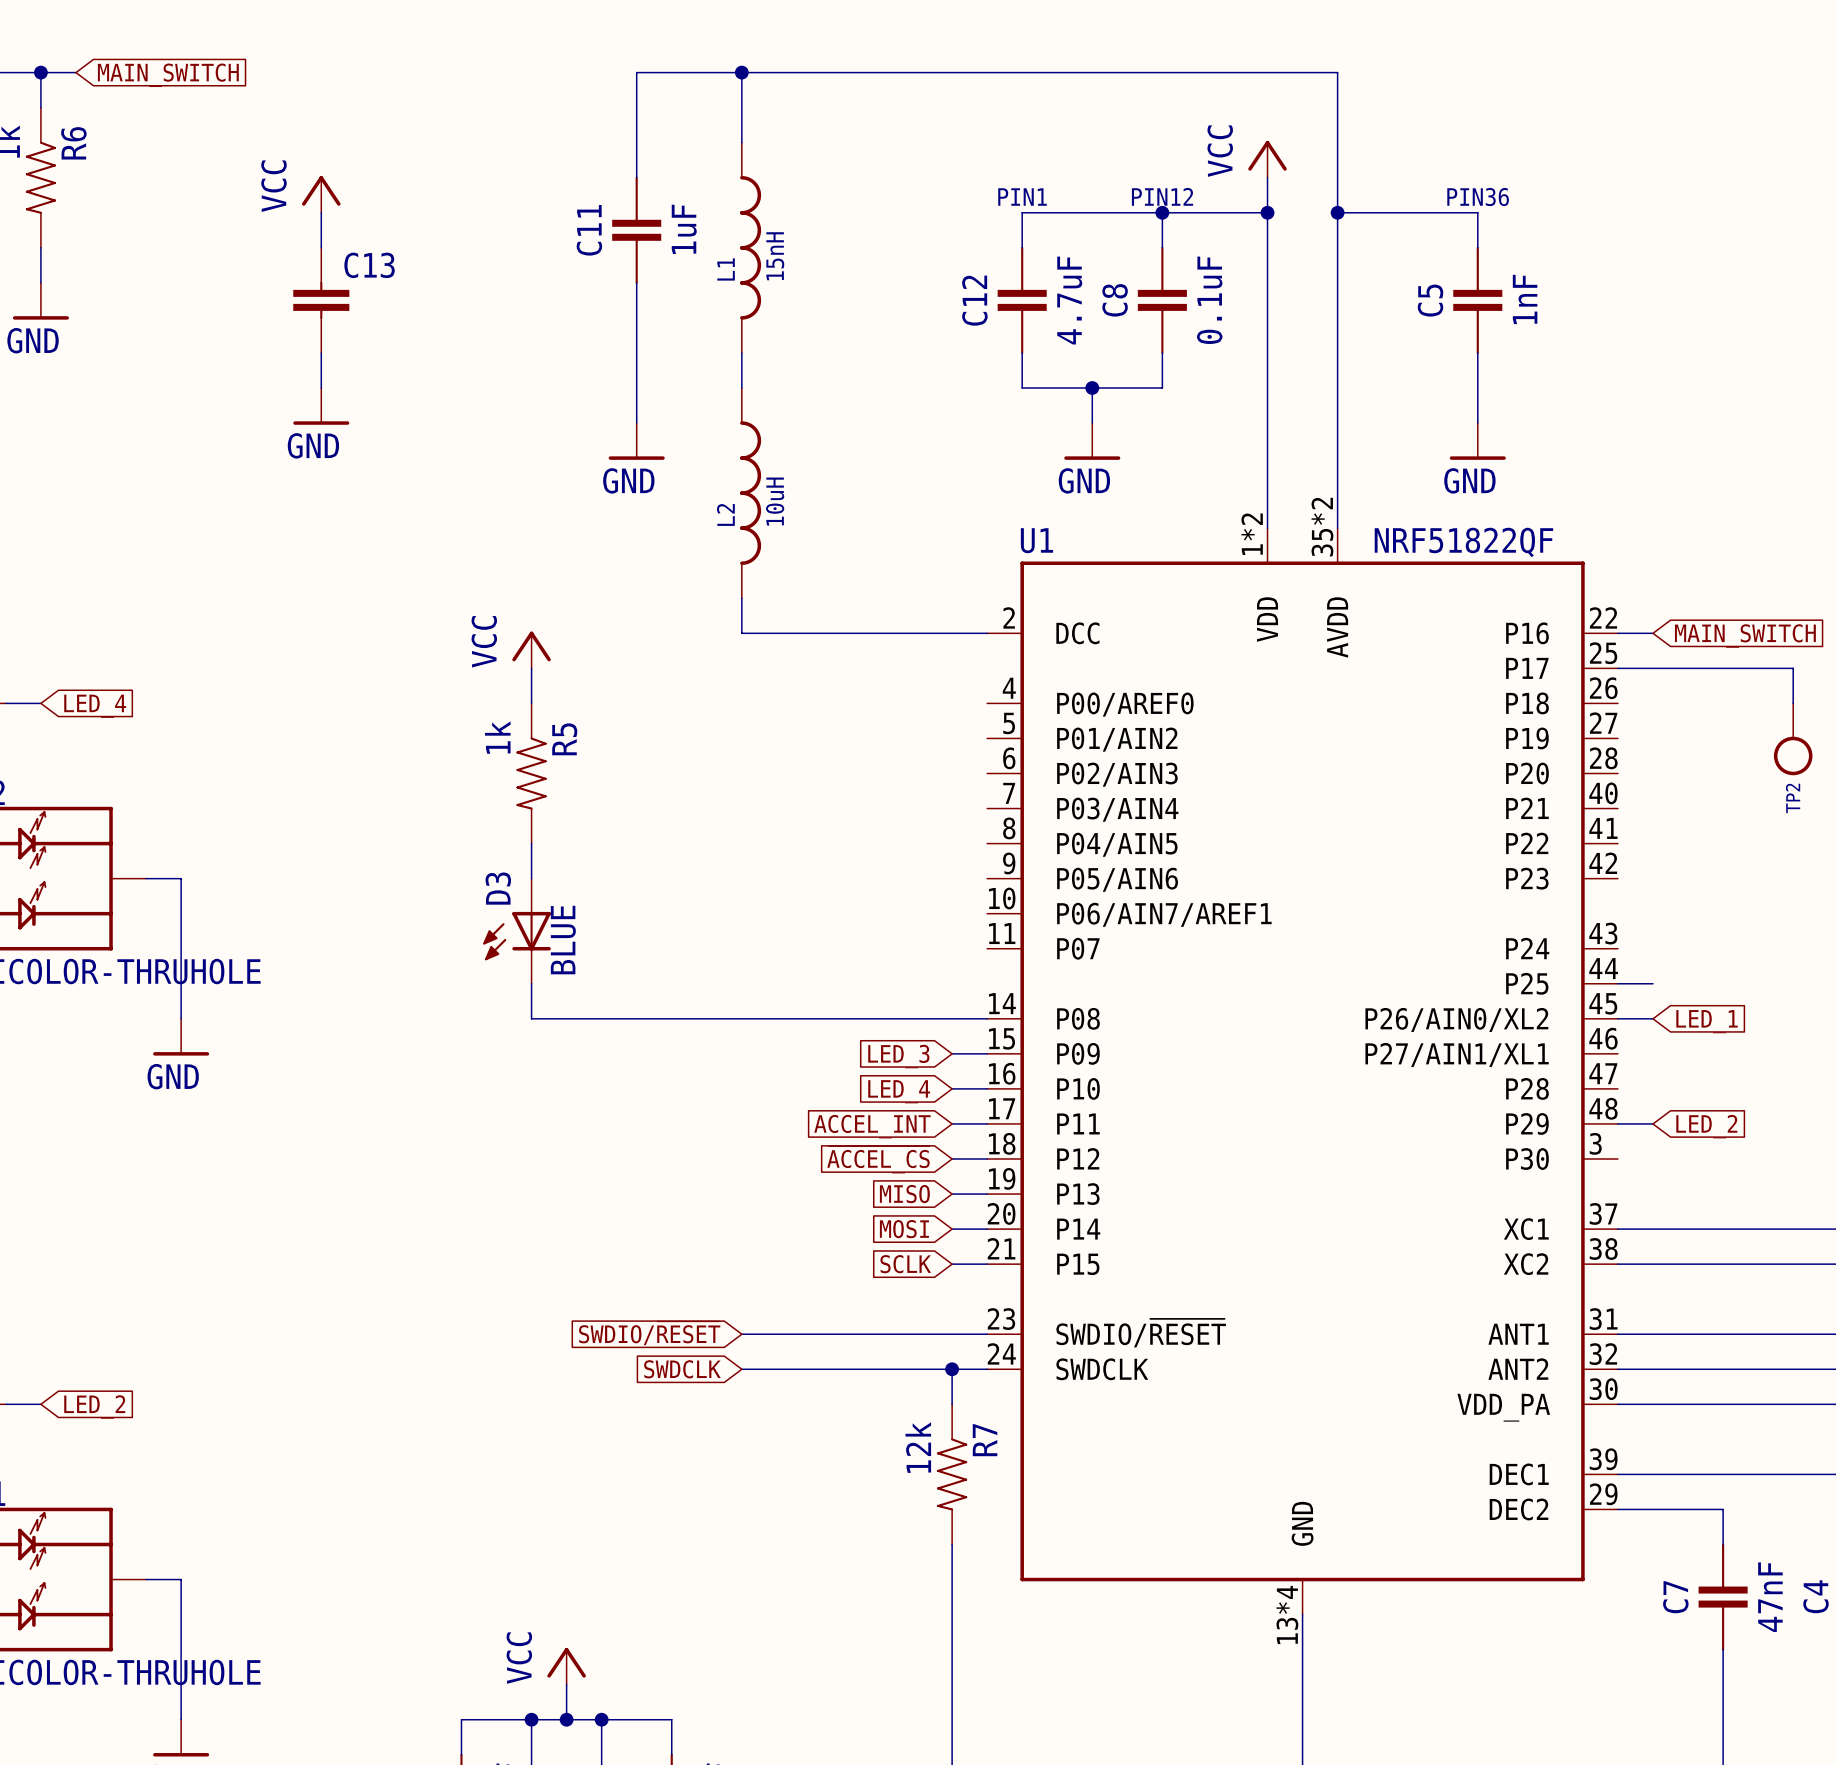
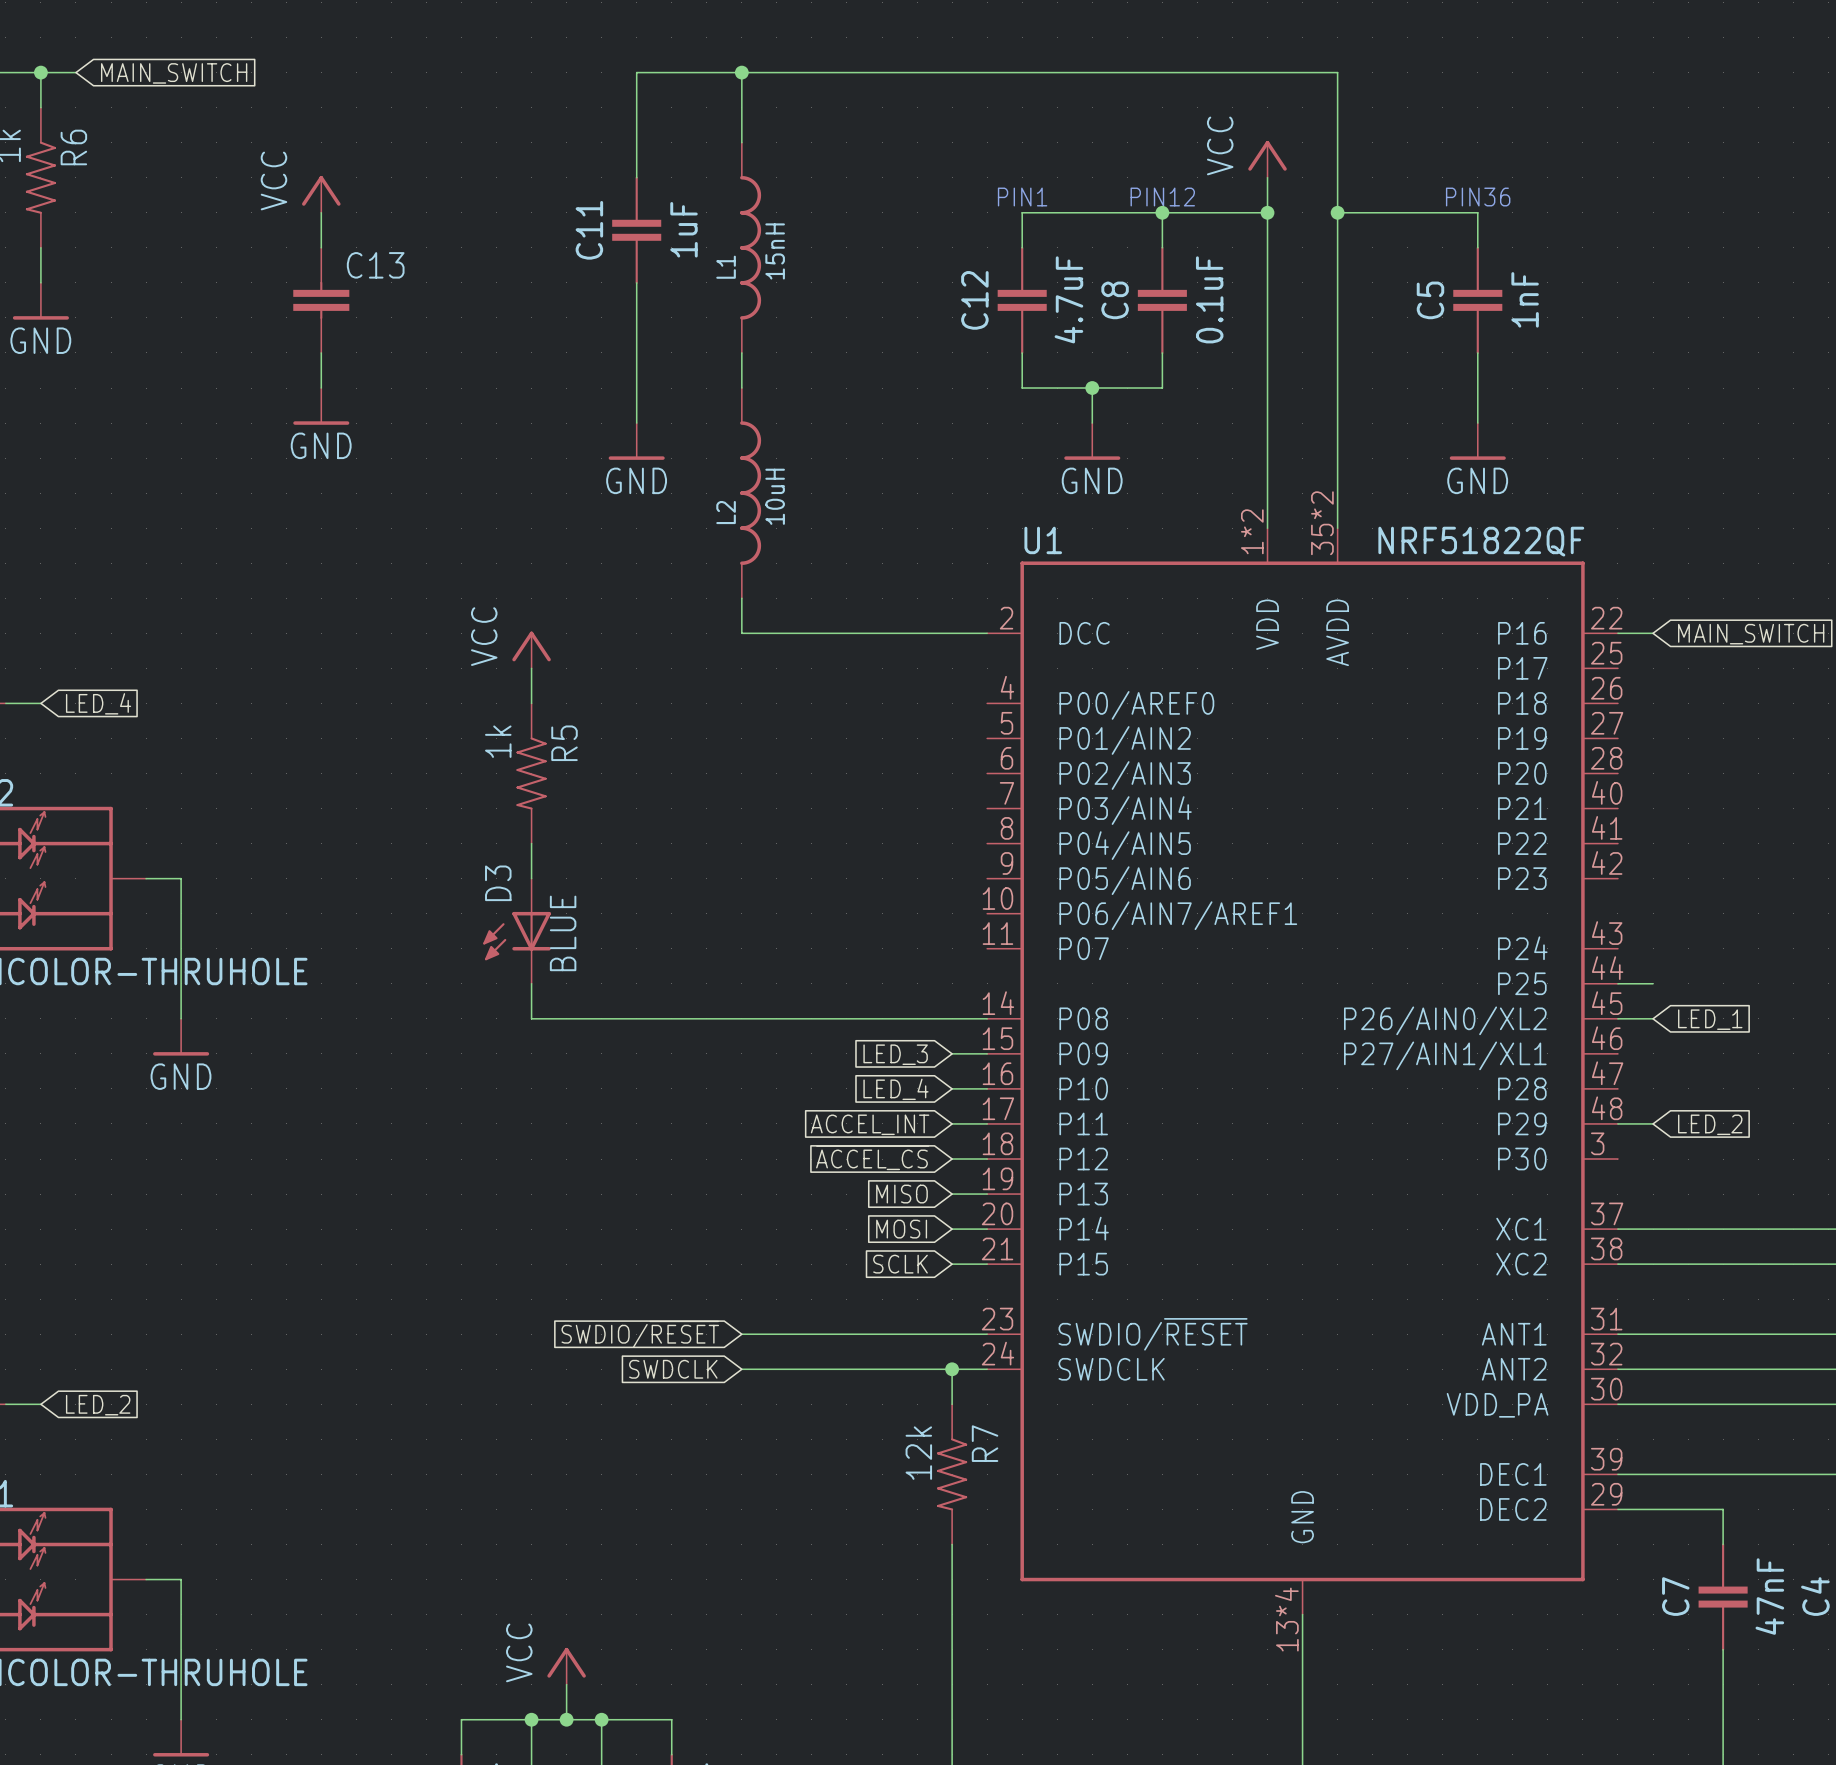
wire: (1617, 668) (1793, 668) (1793, 703) -> none
TP2: (1793, 739) -> none

